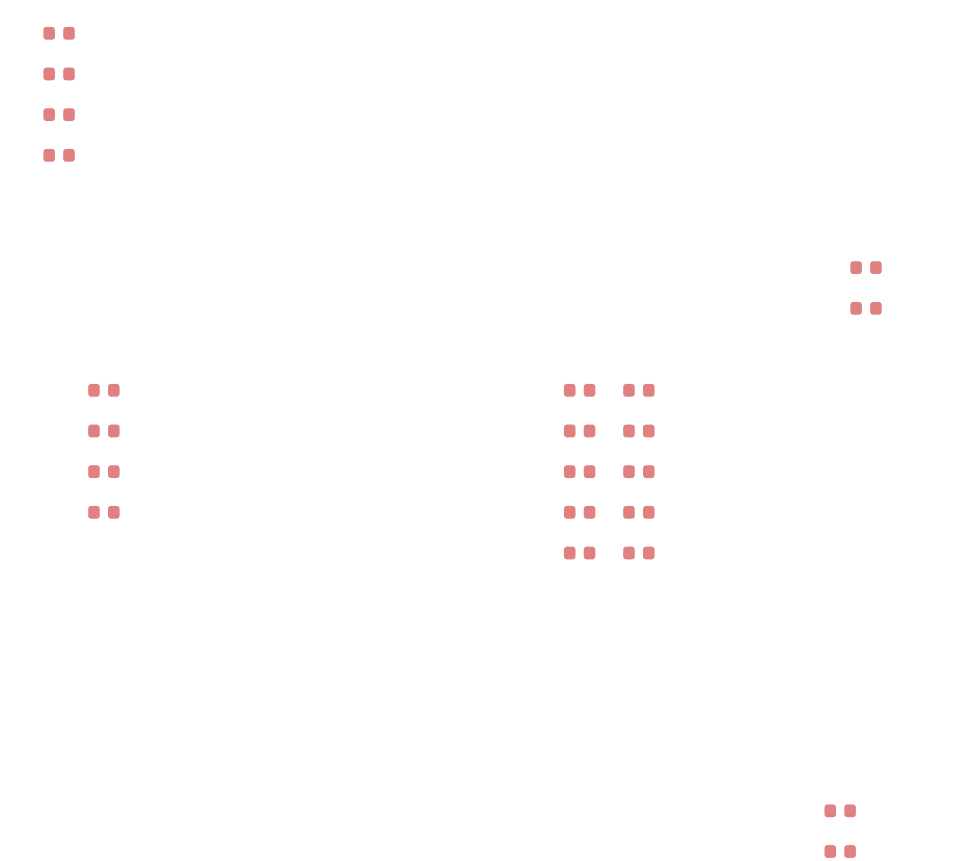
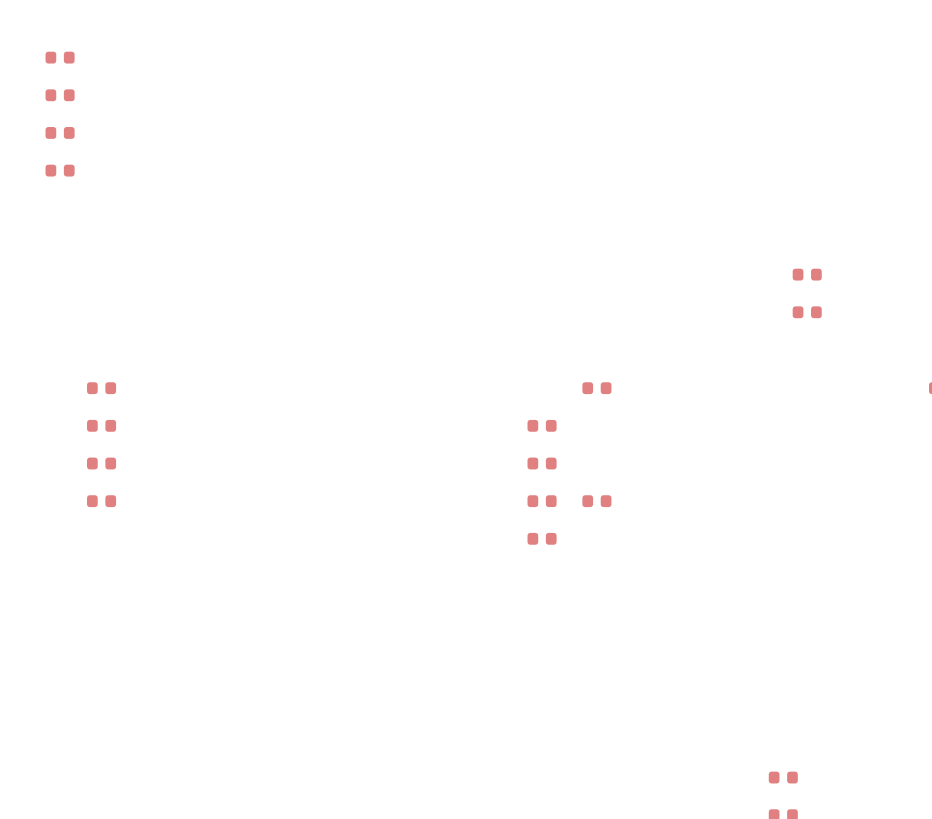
part: (579, 390) -> none
part: (638, 430) -> none
part: (638, 471) -> none
part: (638, 553) -> none

